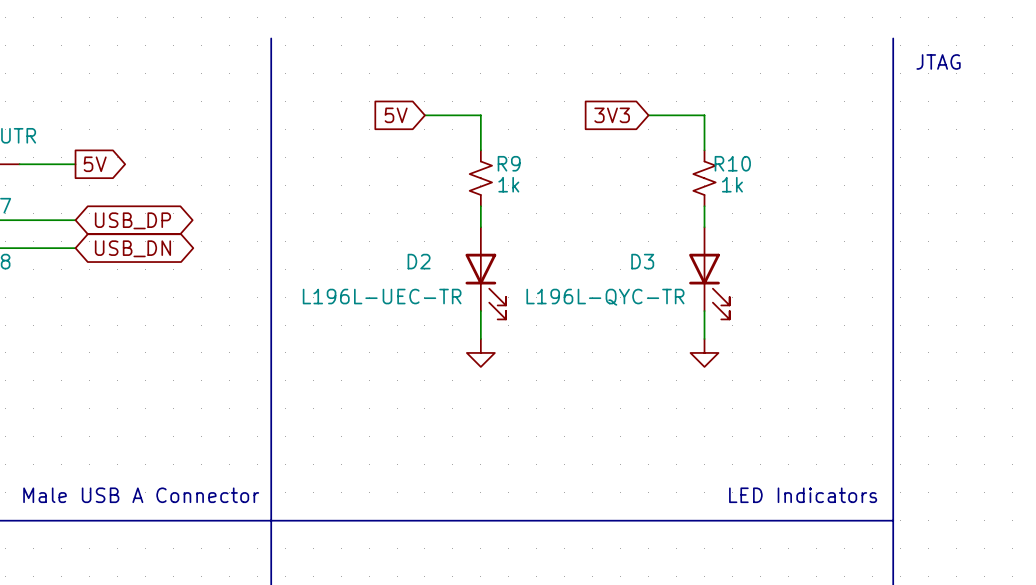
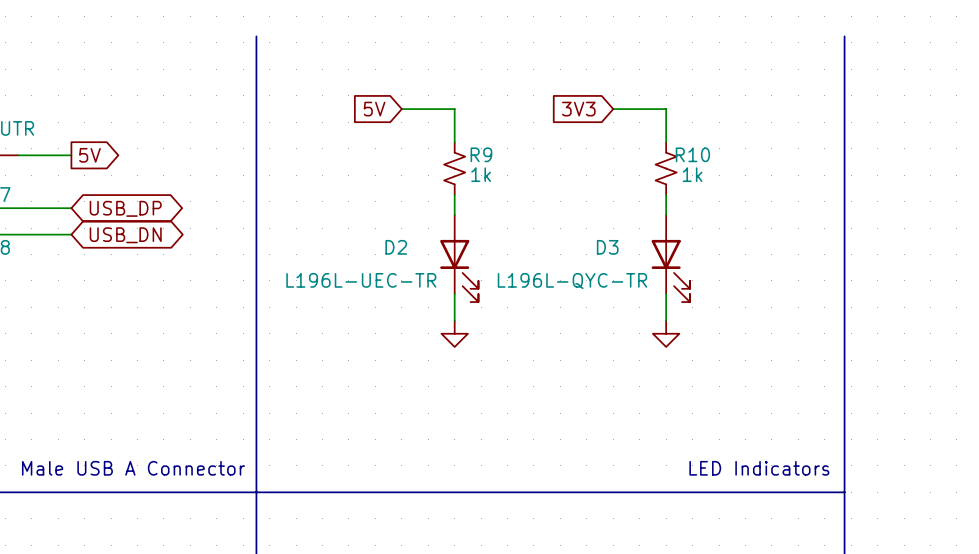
text: JTAG (938, 61) -> none

